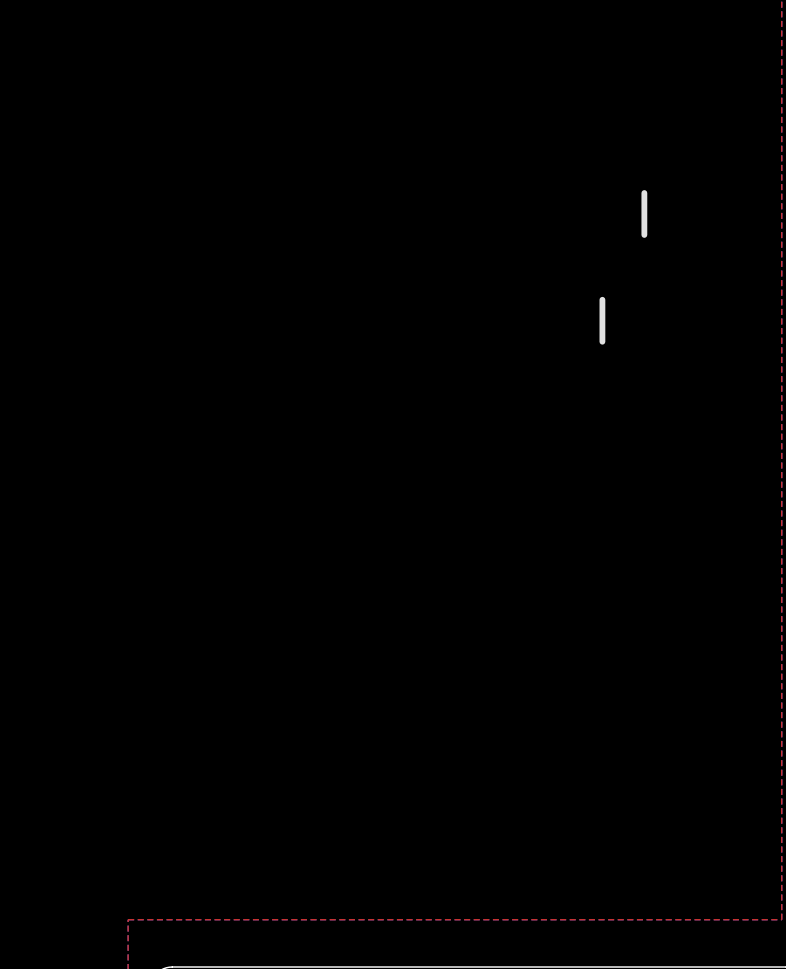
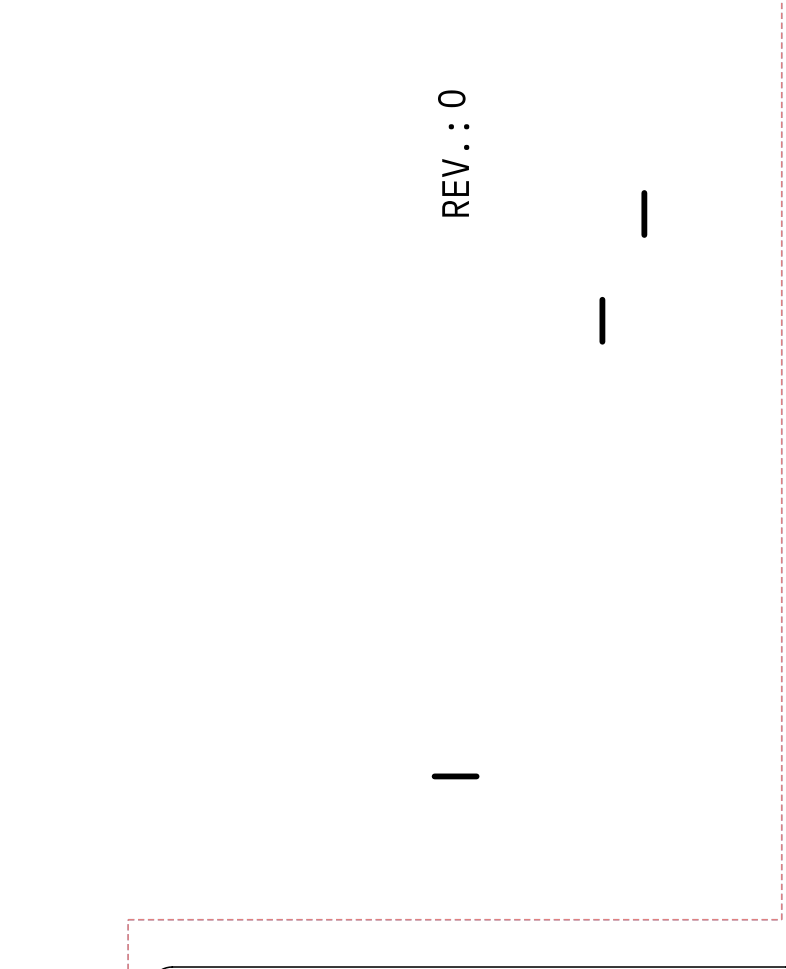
text: none -> O (451, 98)
text: none -> REV.: (455, 170)
line: none -> (434, 776) (476, 776)

